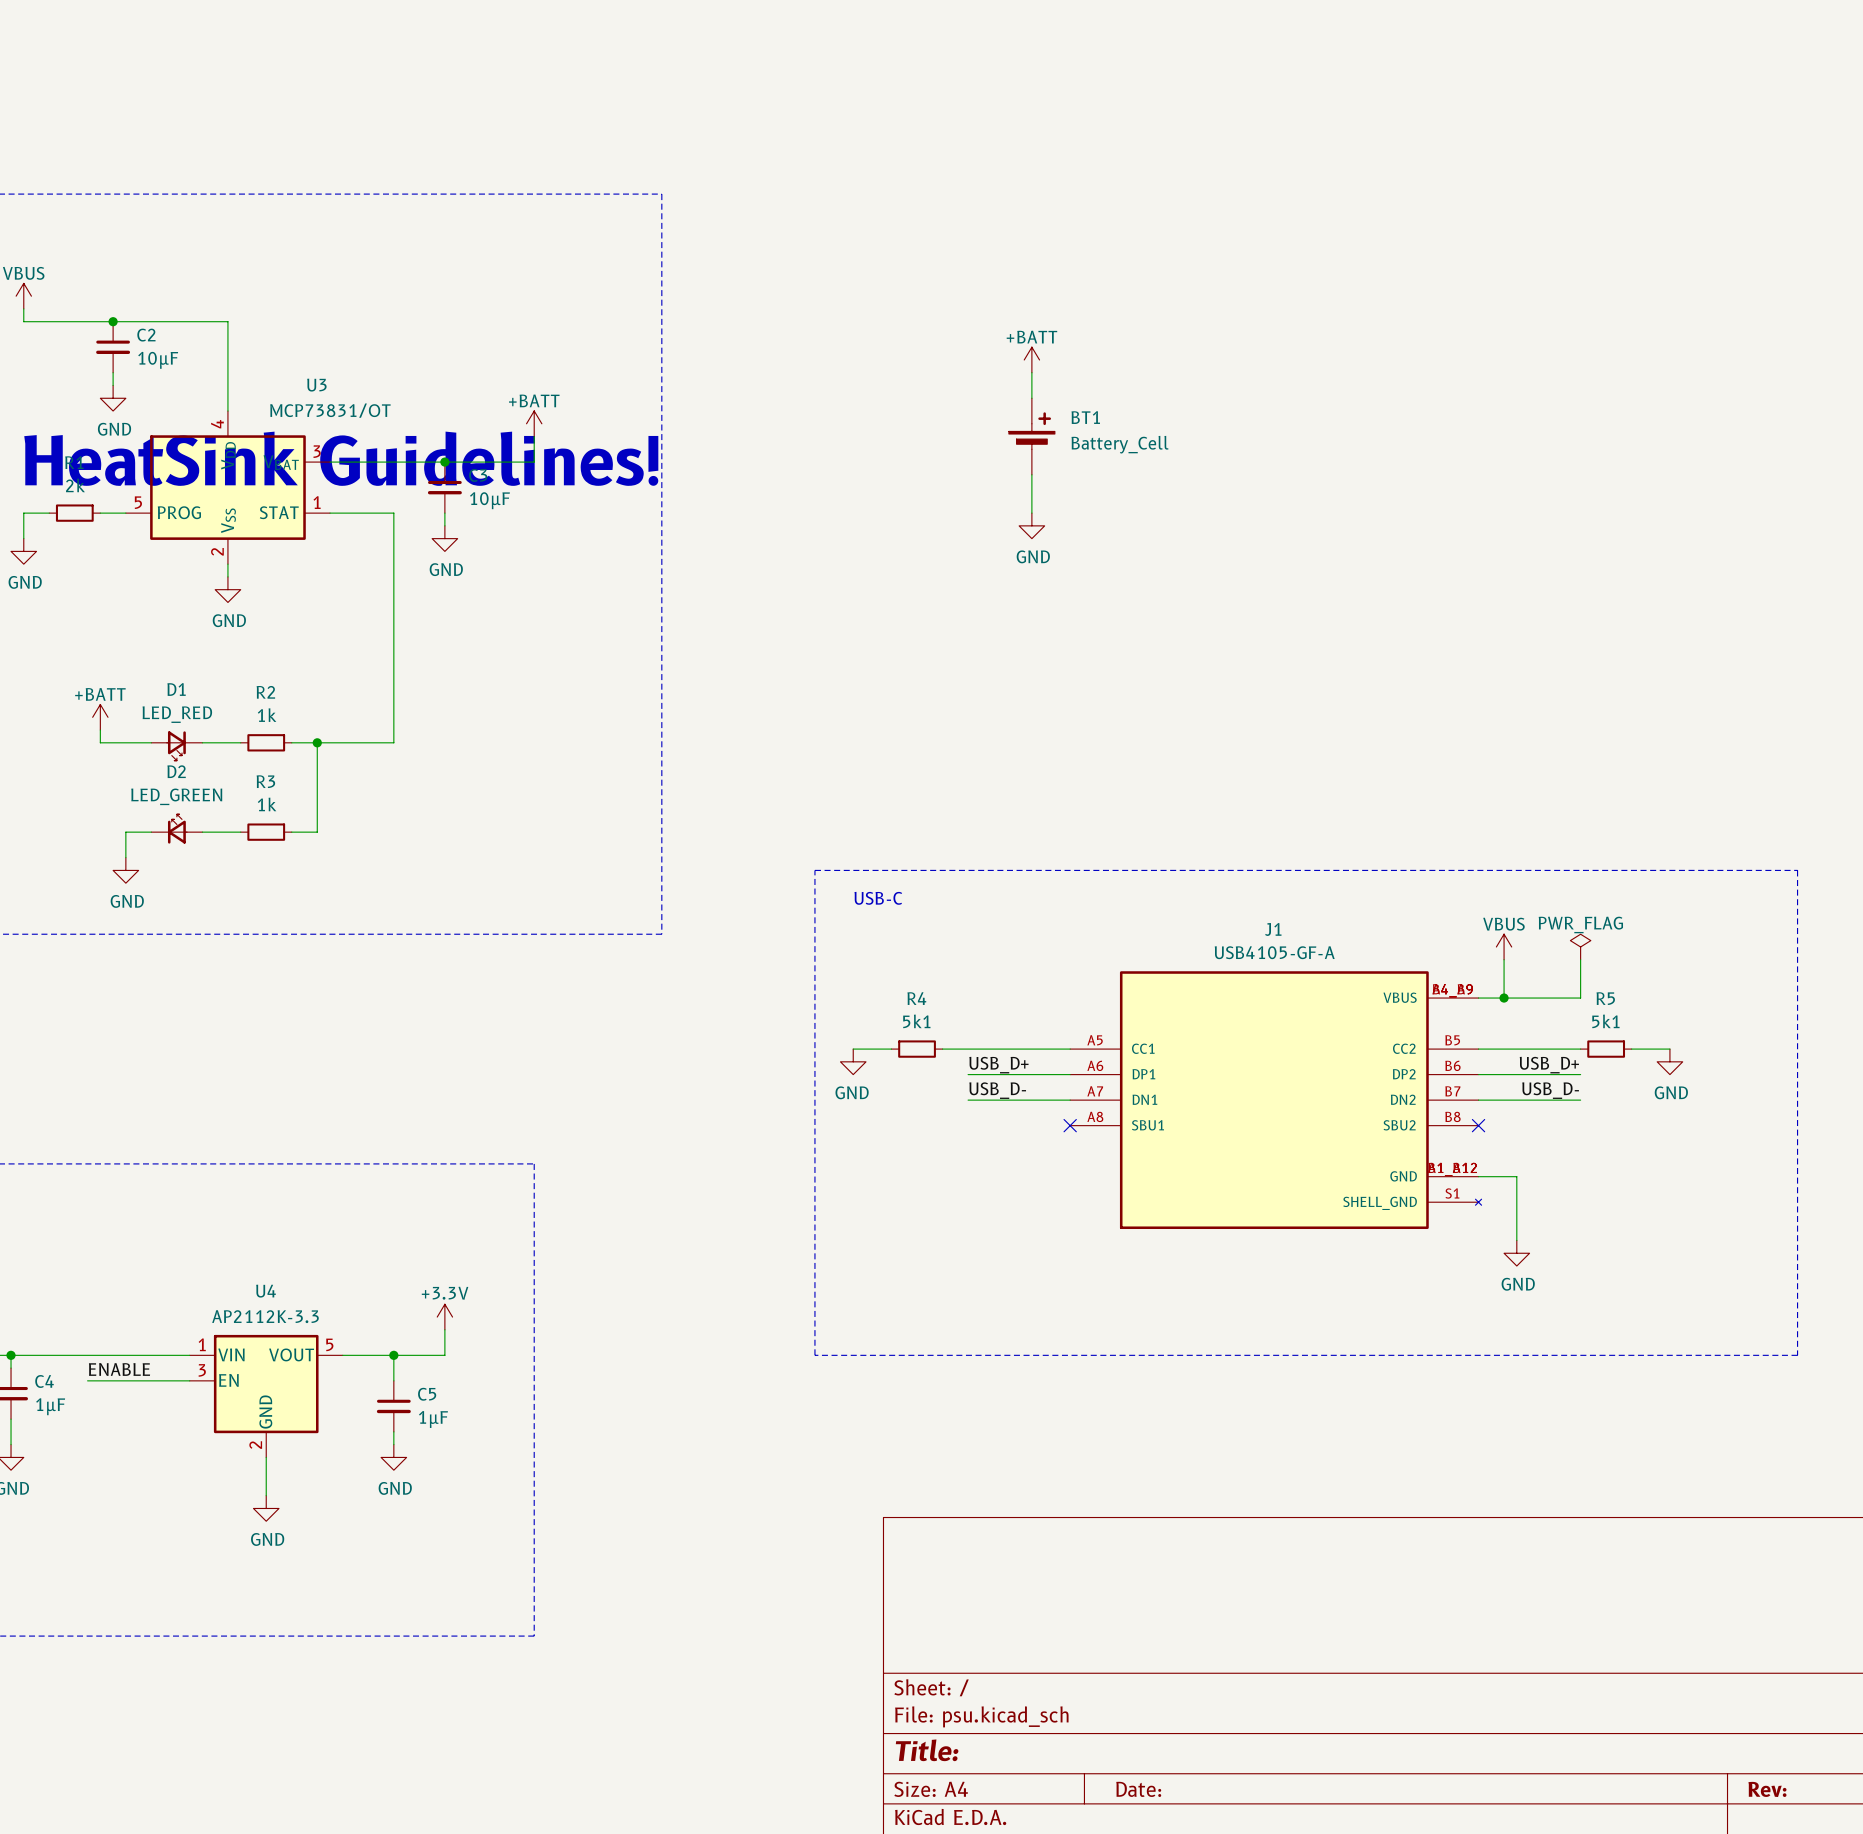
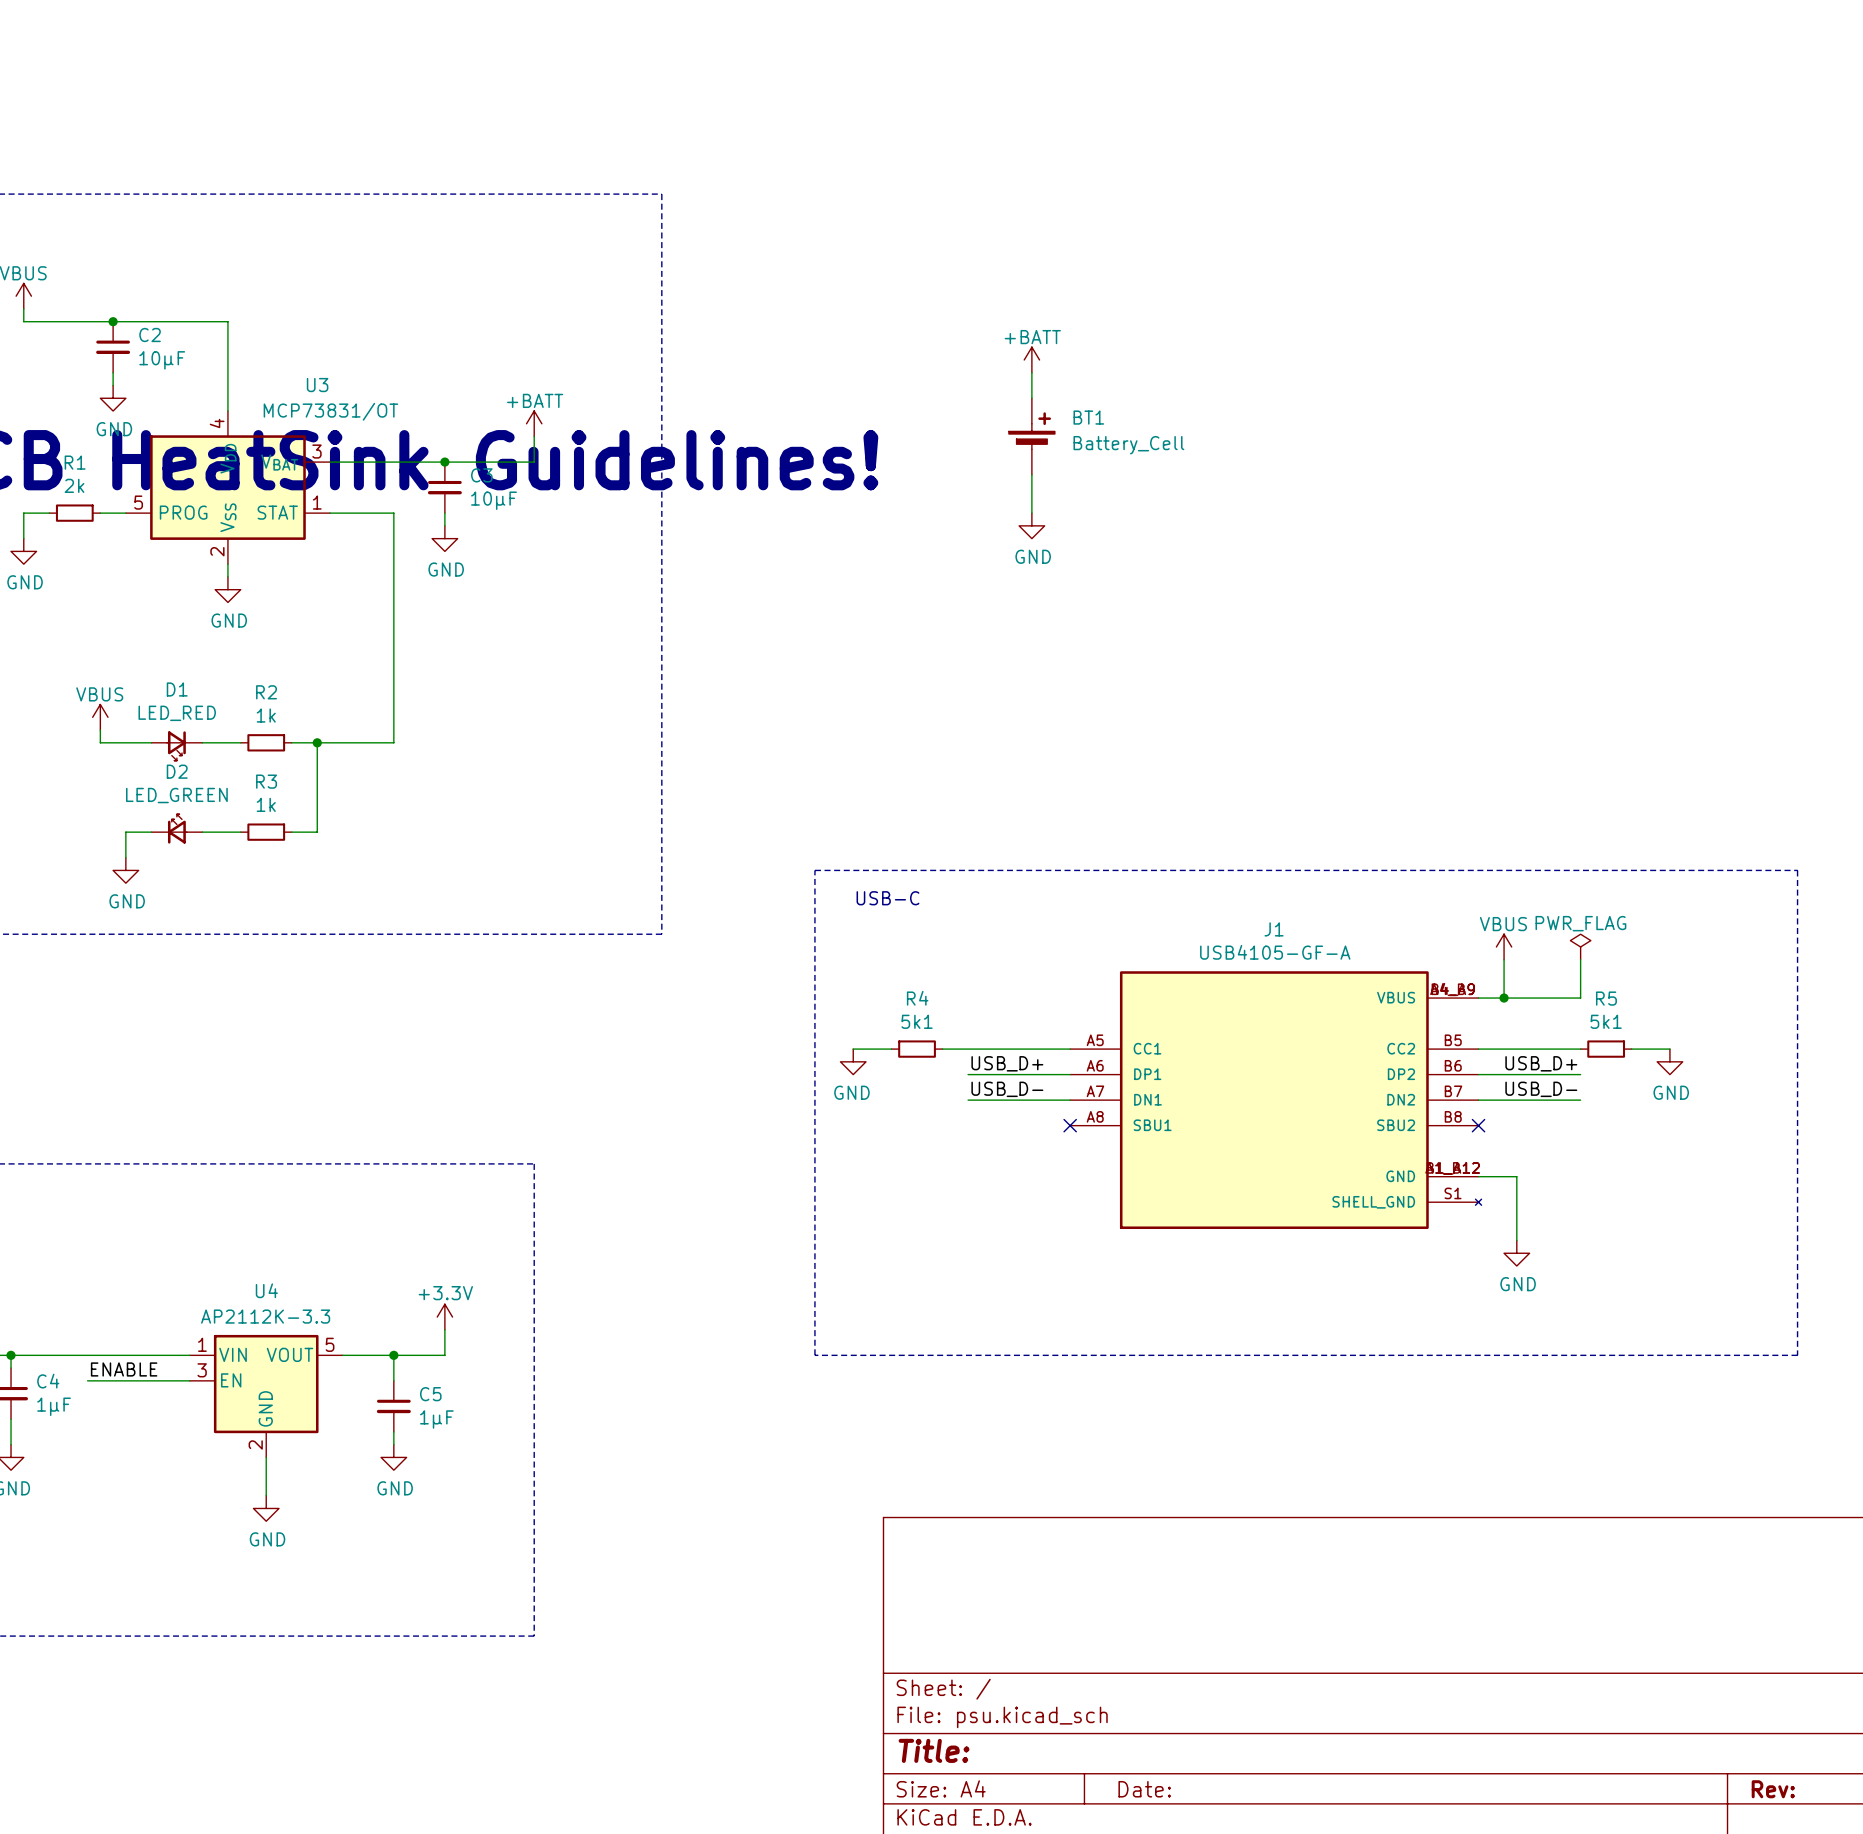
power symbol: +BATT (100, 717) -> VBUS (100, 717)

